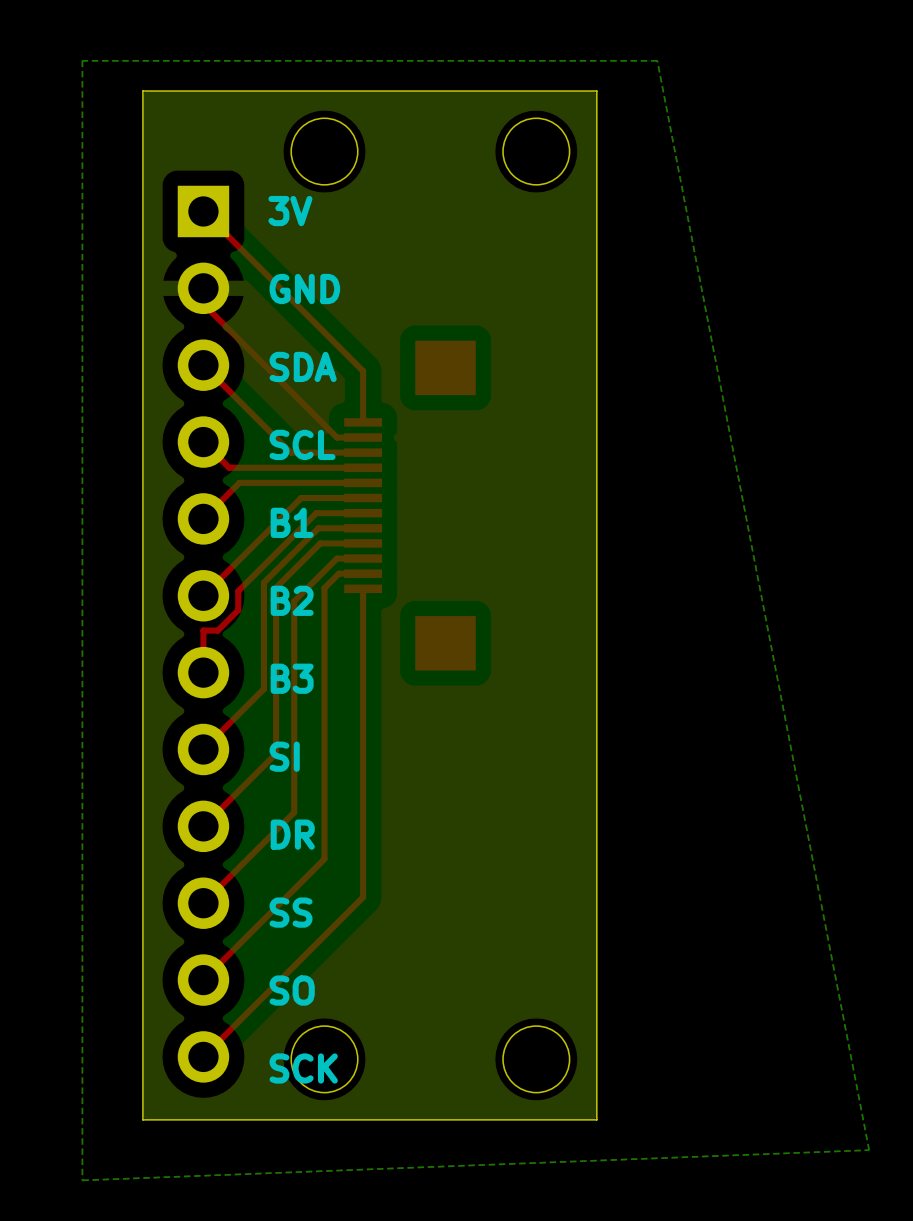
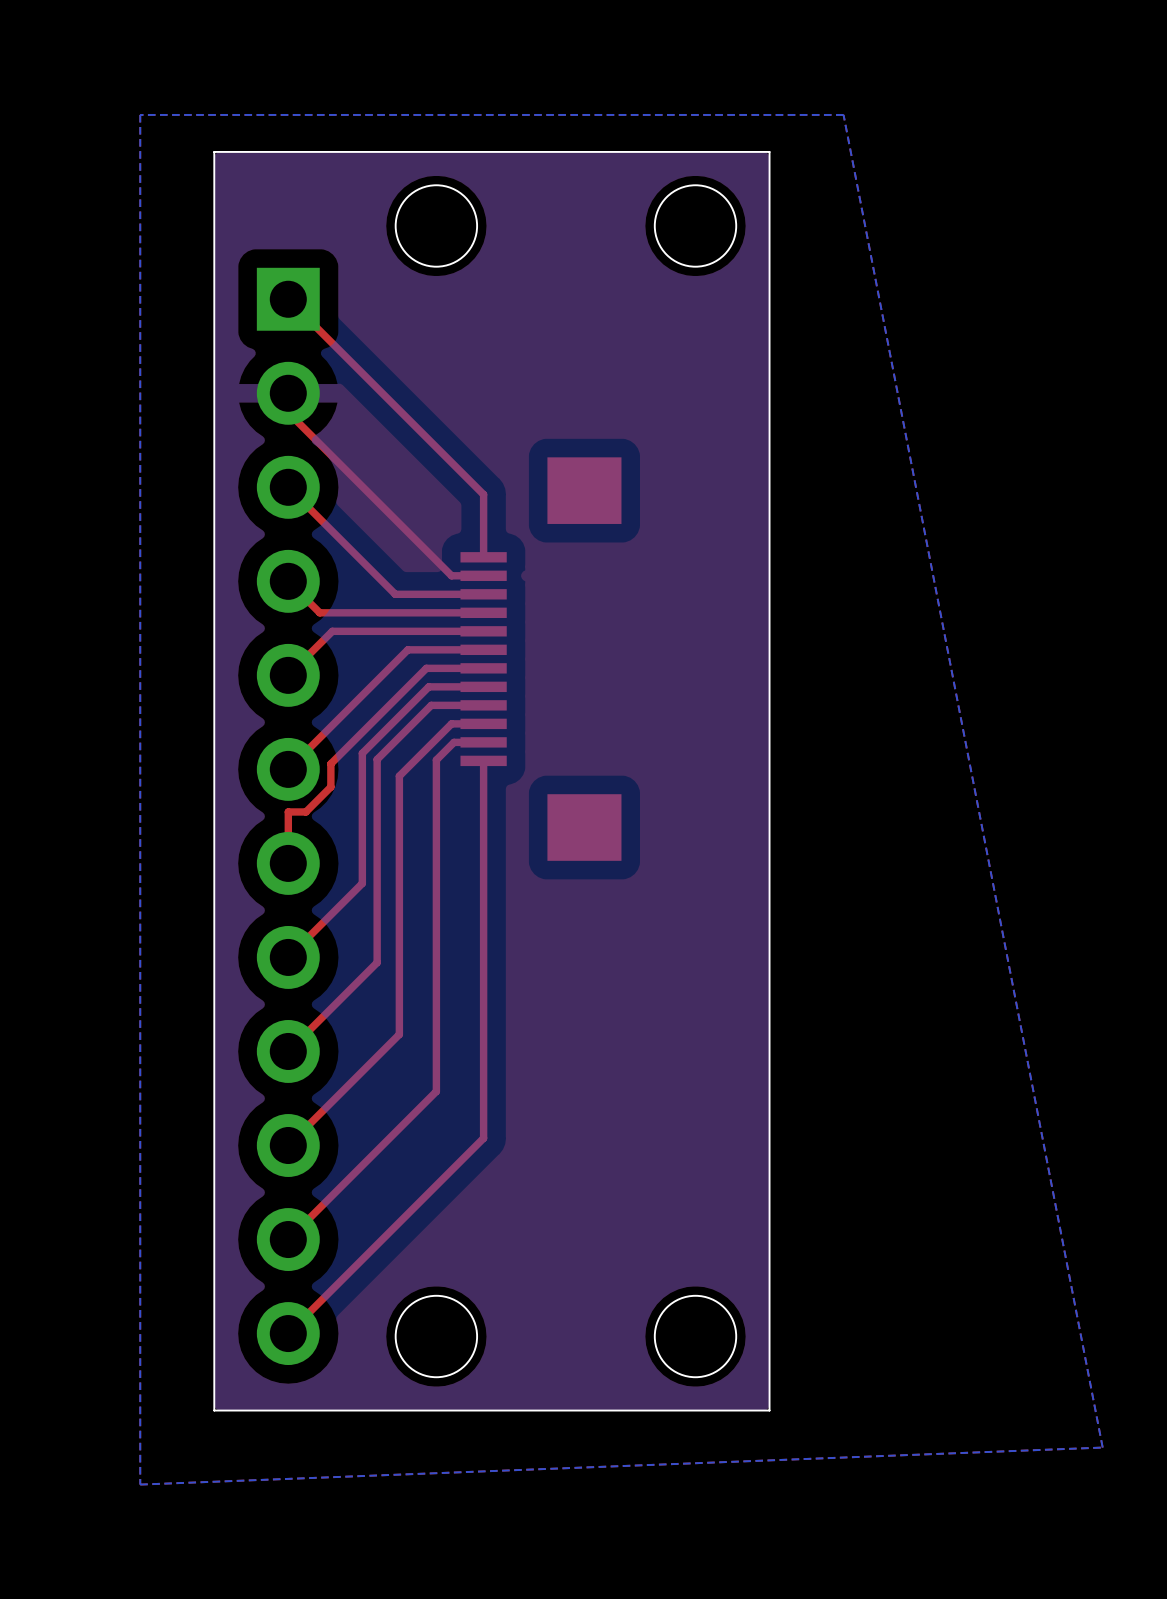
text: 3V (290, 211) -> none
text: GND (304, 289) -> none
text: SDA (303, 366) -> none
text: SCL (302, 444) -> none
text: B1 (292, 522) -> none
text: B2 (292, 600) -> none
text: B3 (292, 678) -> none
text: SI (284, 756) -> none
text: DR (292, 834) -> none
text: SS (291, 912) -> none
text: SO (292, 990) -> none
text: SCK (303, 1068) -> none

